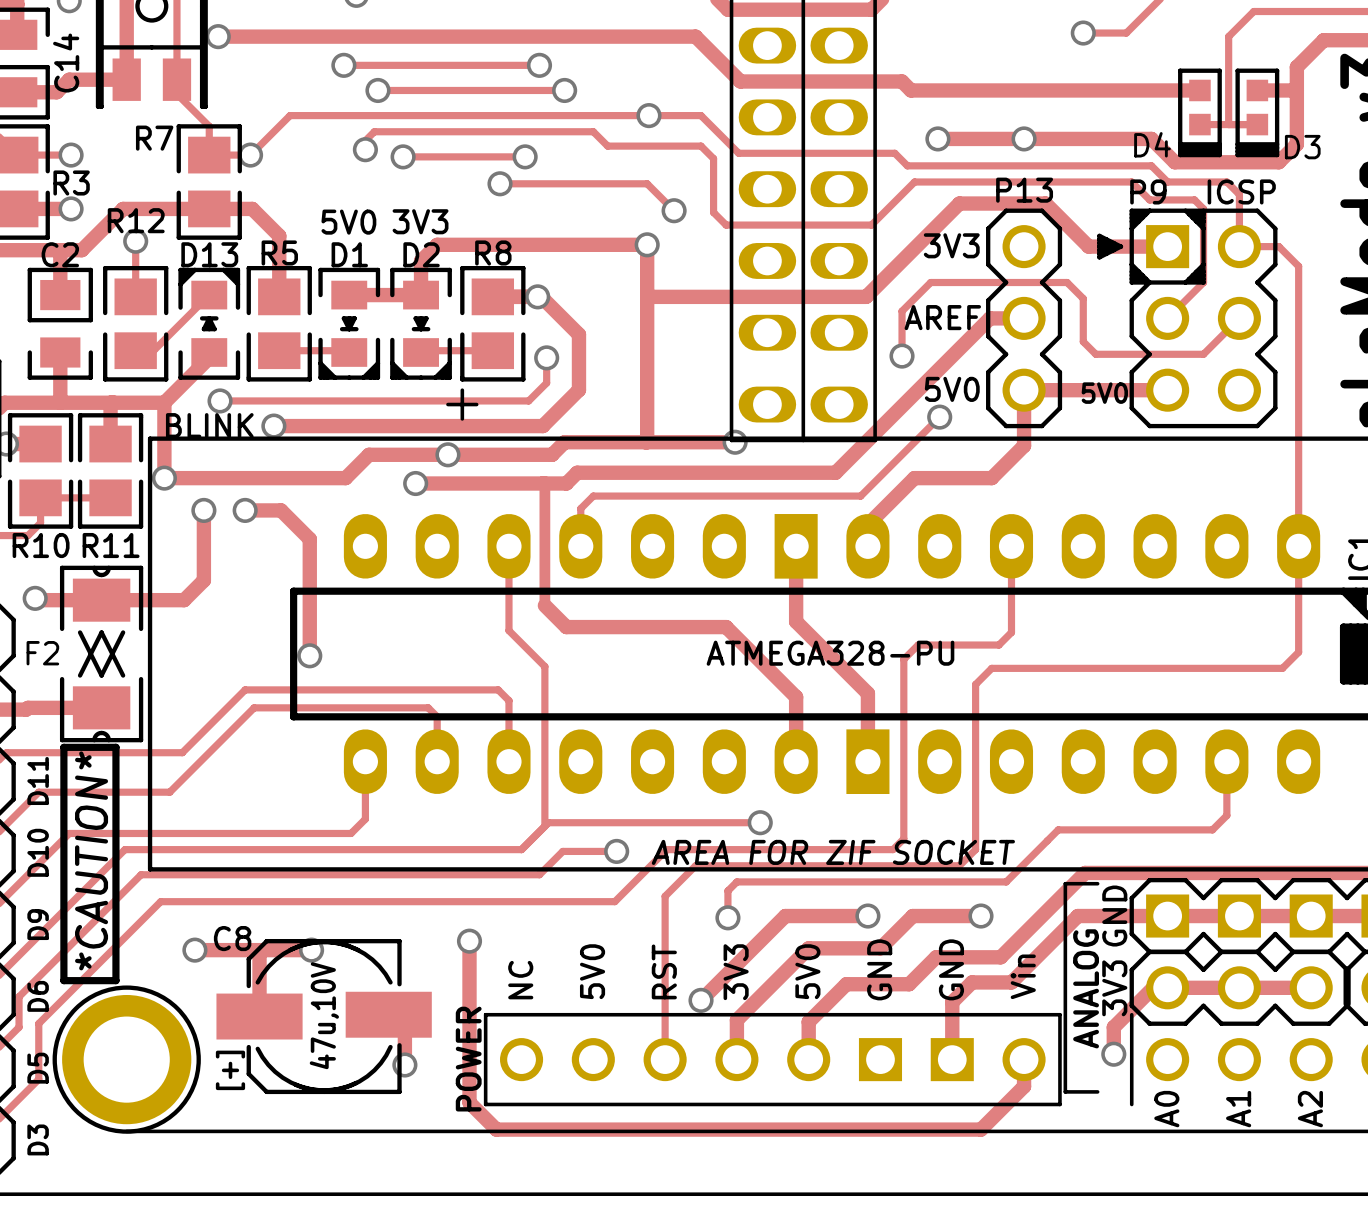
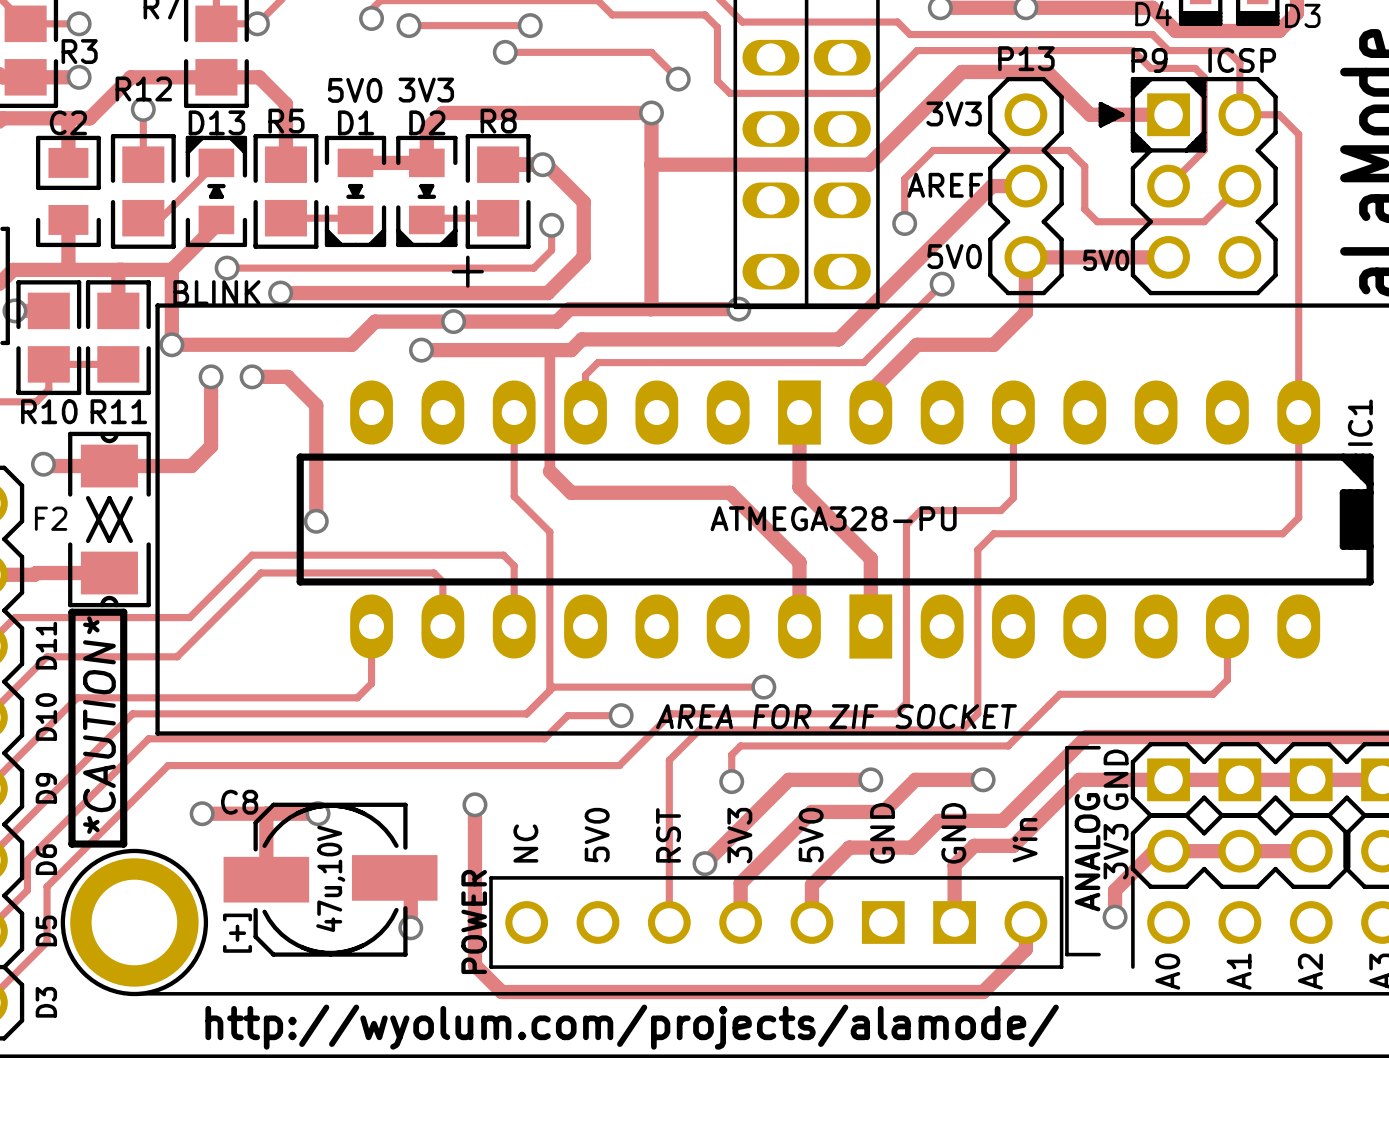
text: none -> http://wyolum.com/projects/alamode/ (632, 1027)

